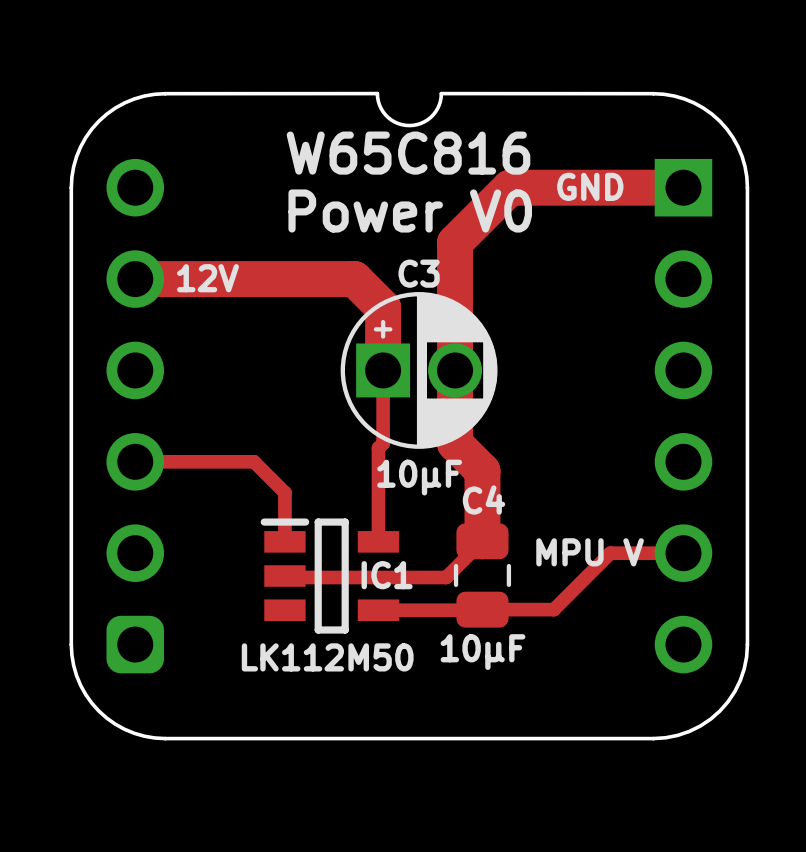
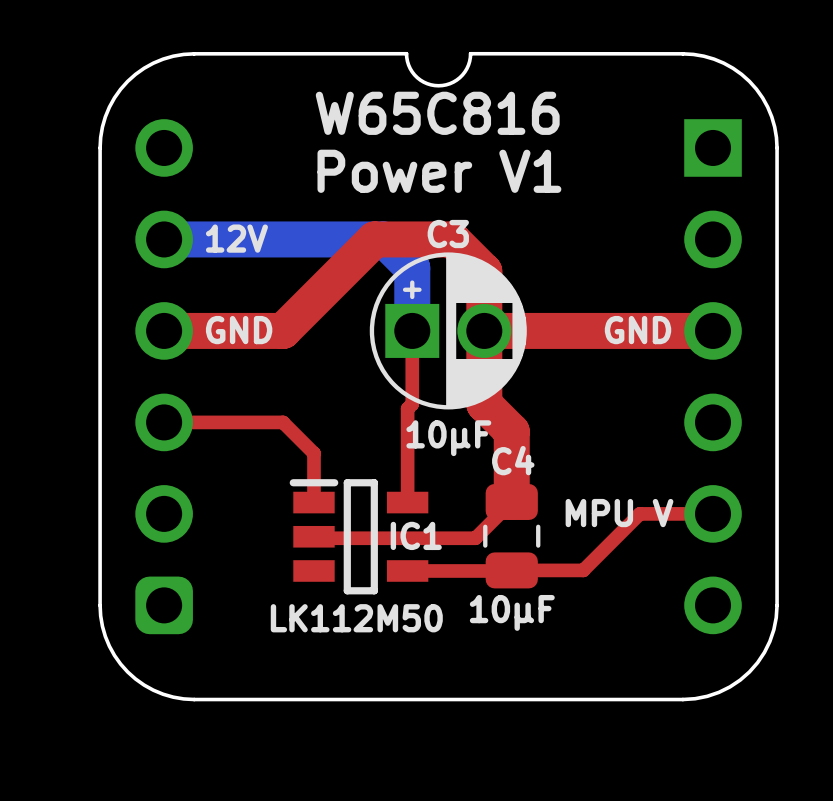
text position: GND (590, 186) -> GND (638, 330)
top track: (683, 187) (509, 187) (455, 242) (455, 311) -> none
text: Power V0 (410, 211) -> Power V1 (439, 171)
top track: (135, 279) (345, 279) -> (164, 330) (283, 330) (374, 239)
bottom track: none -> (164, 239) (383, 239) (412, 268) (412, 330)
top track: (354, 279) (383, 307) (383, 370) -> (383, 239) (452, 239) (484, 271)
text: none -> GND (239, 330)
top track: none -> (484, 330) (713, 330)

